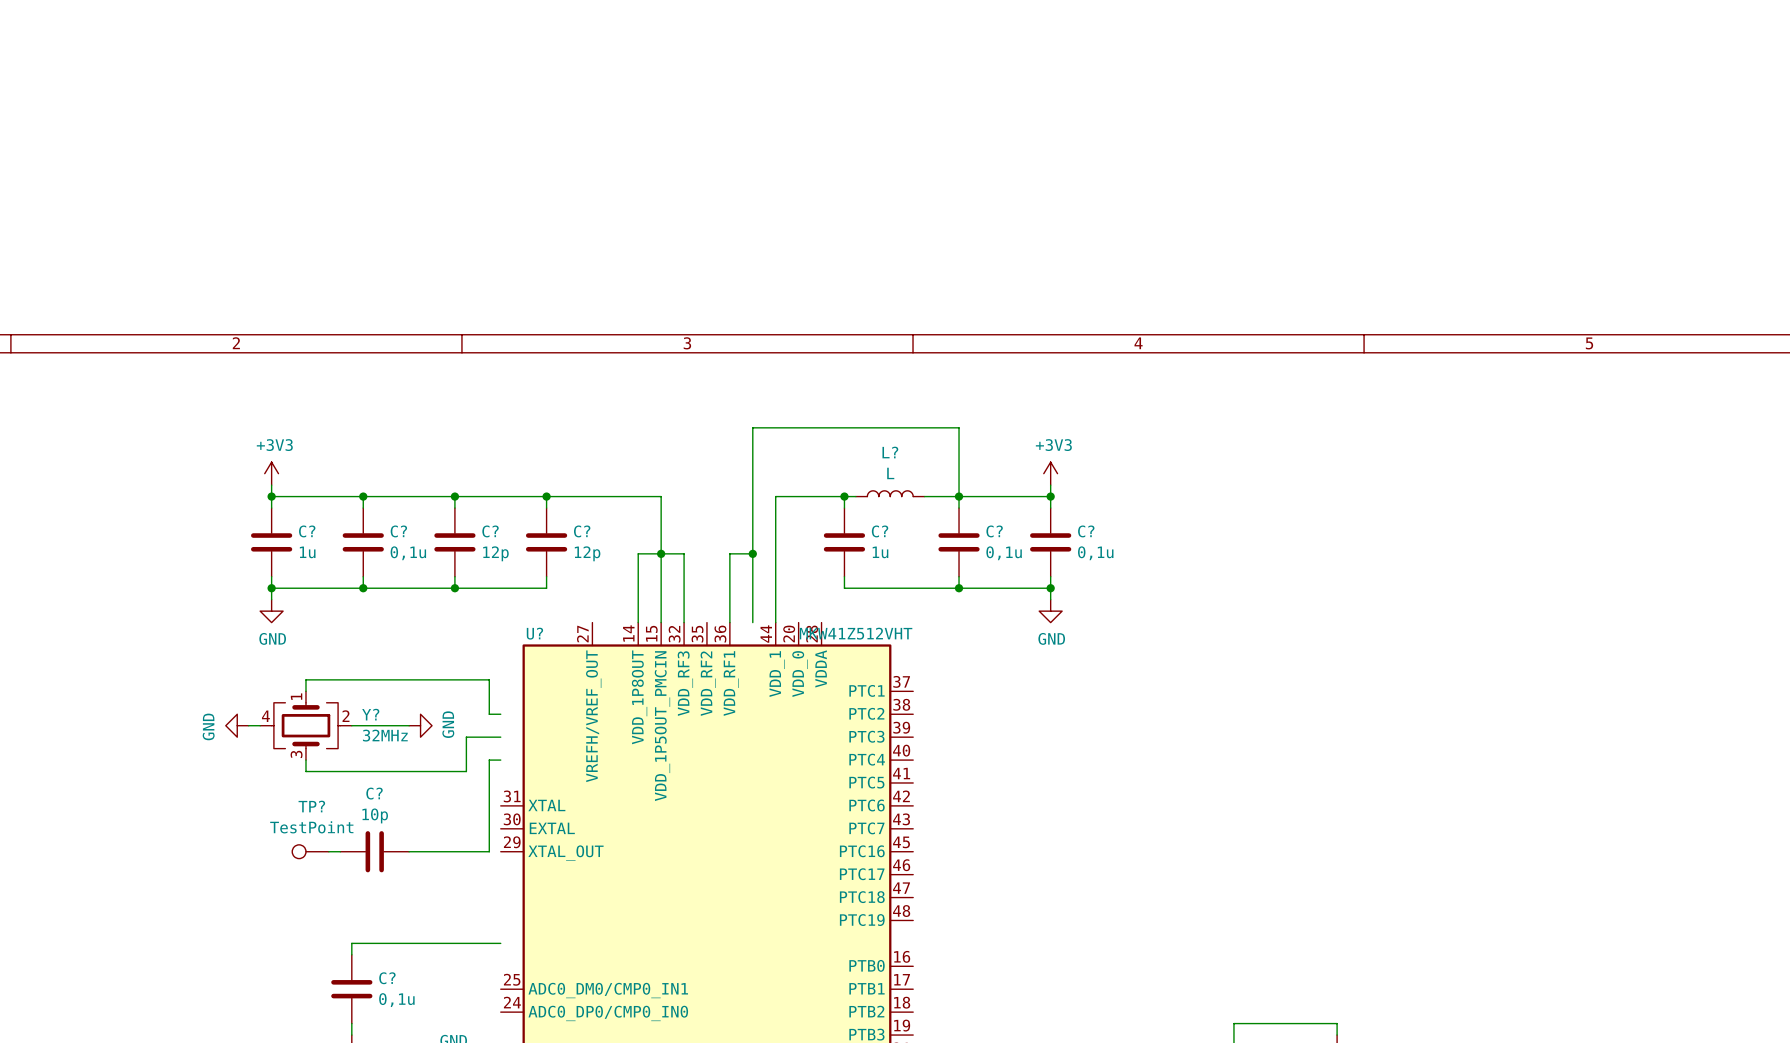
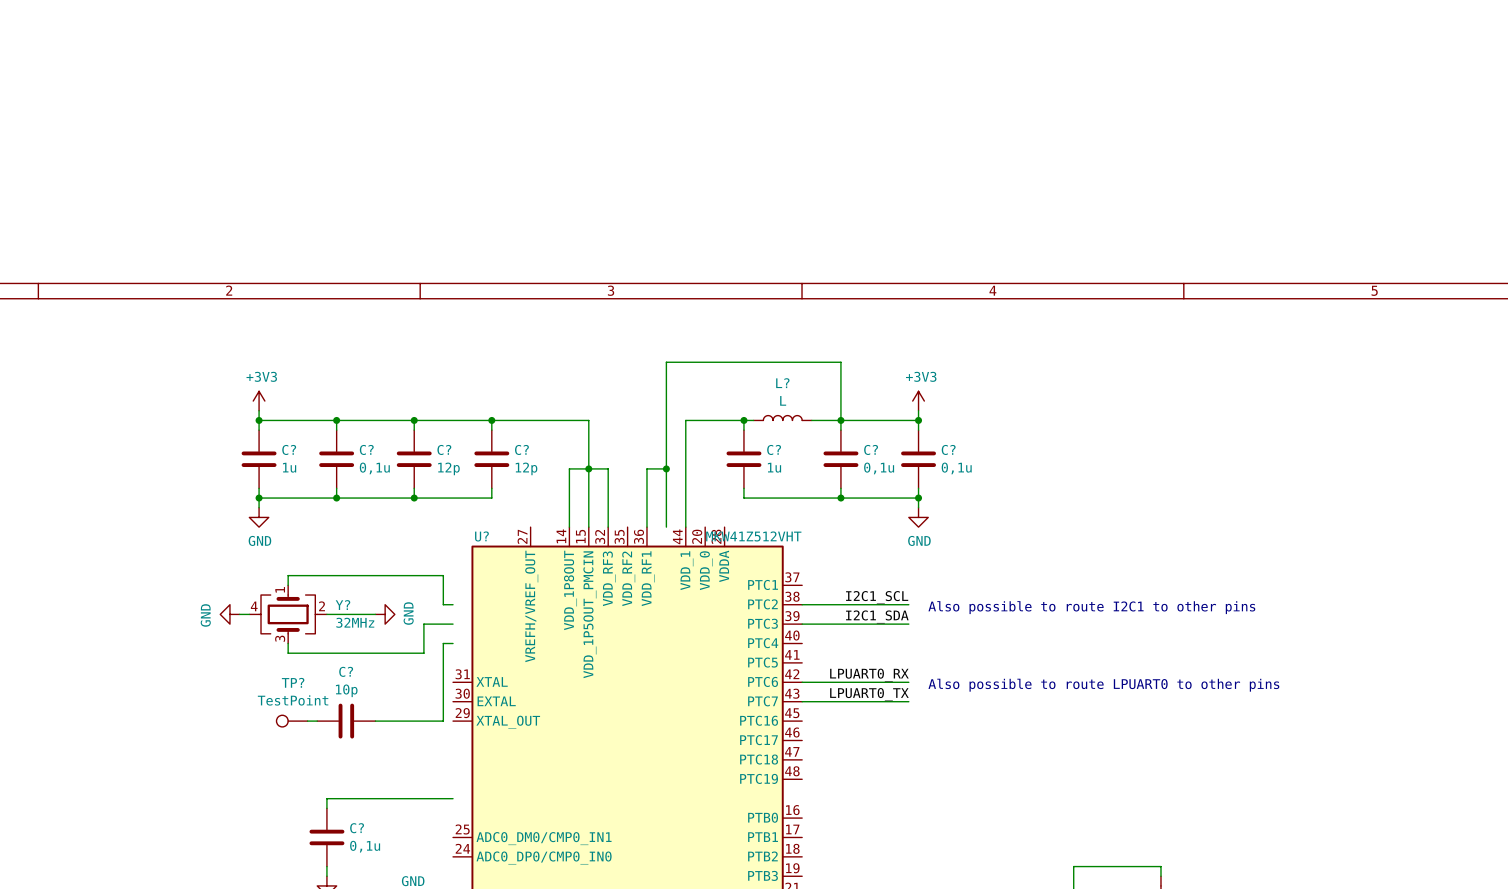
label: none -> I2C1_SCL (877, 597)
wire: none -> (802, 604) (908, 604)
text: none -> Also possible to route I2C1 to other pins (1091, 607)
label: none -> I2C1_SDA (877, 616)
wire: none -> (802, 624) (908, 624)
label: none -> LPUART0_RX (869, 675)
wire: none -> (802, 682) (908, 682)
text: none -> Also possible to route LPUART0 to other pins (1103, 685)
label: none -> LPUART0_TX (869, 694)
wire: none -> (802, 701) (908, 701)

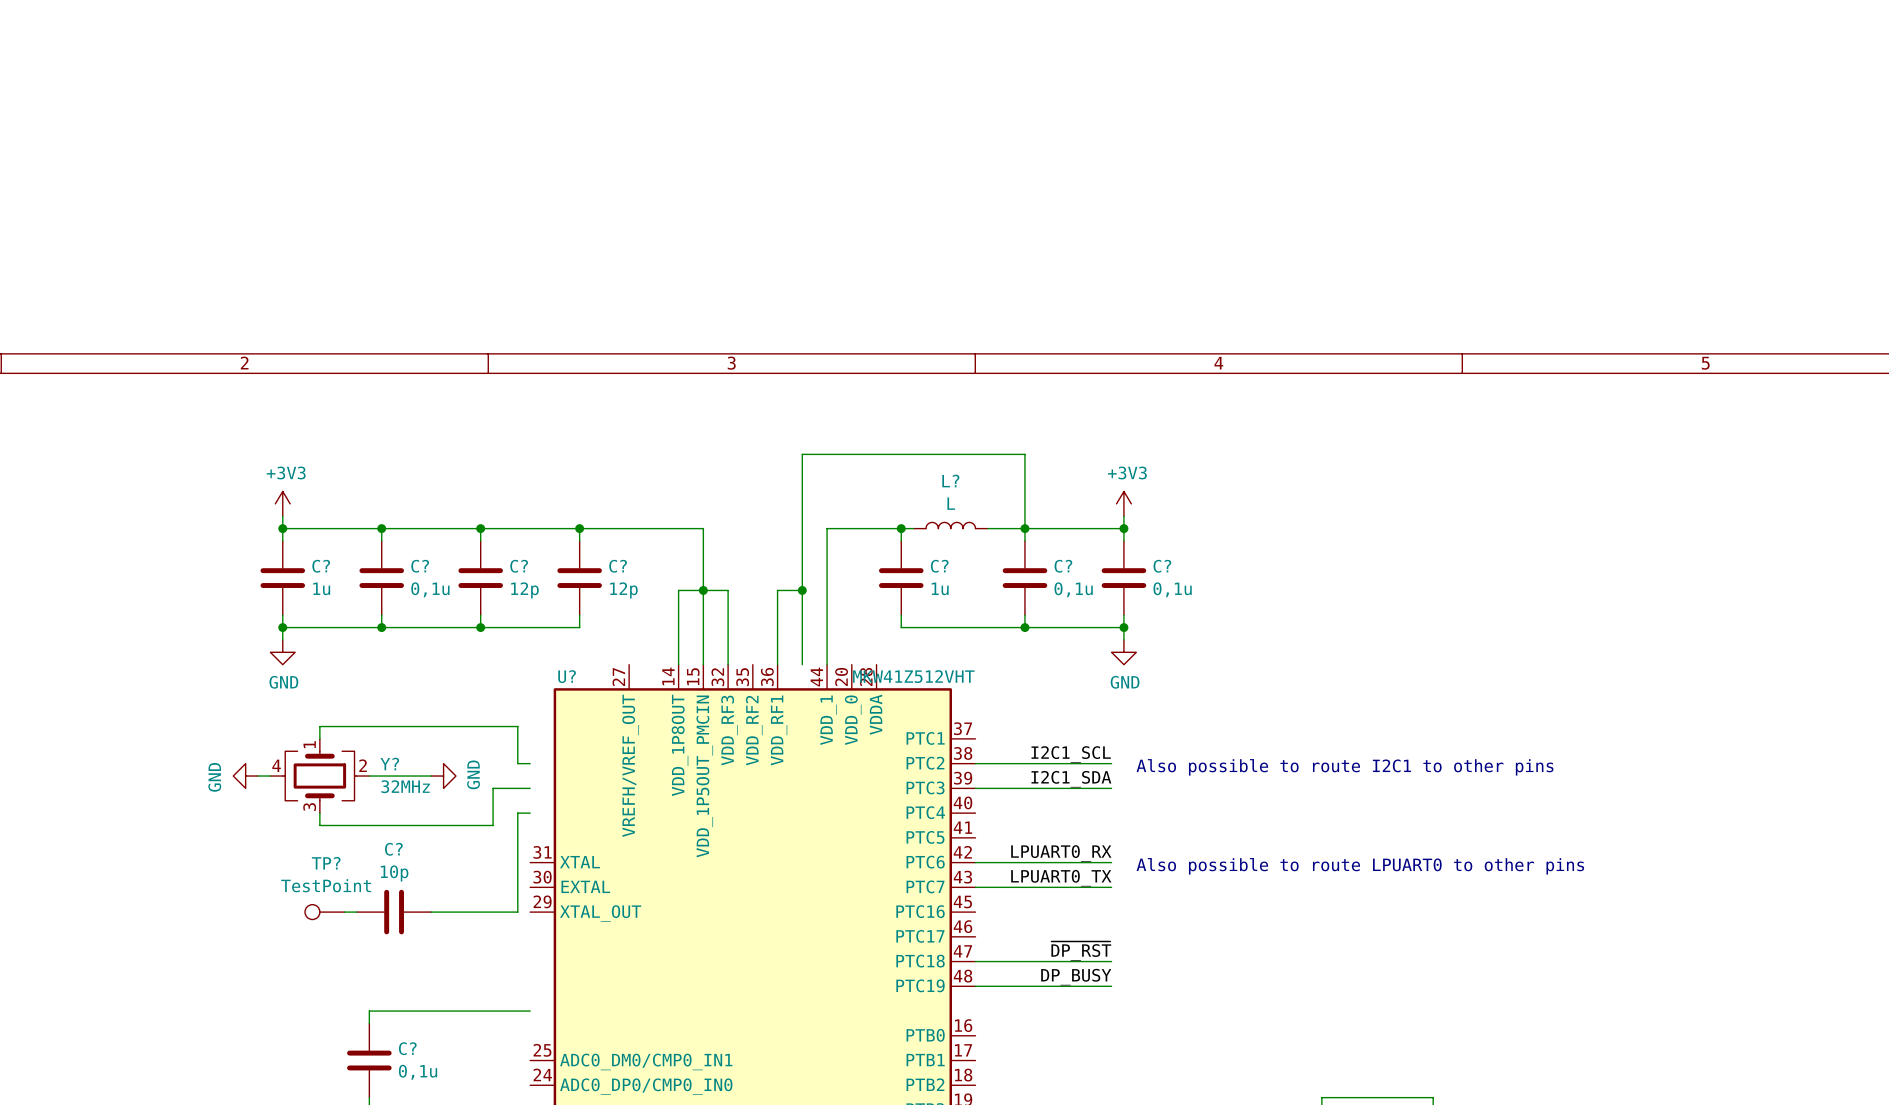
label: none -> ~{DP_RST} (1081, 951)
wire: none -> (975, 961) (1111, 961)
label: none -> DP_BUSY (1076, 977)
wire: none -> (975, 986) (1111, 986)

